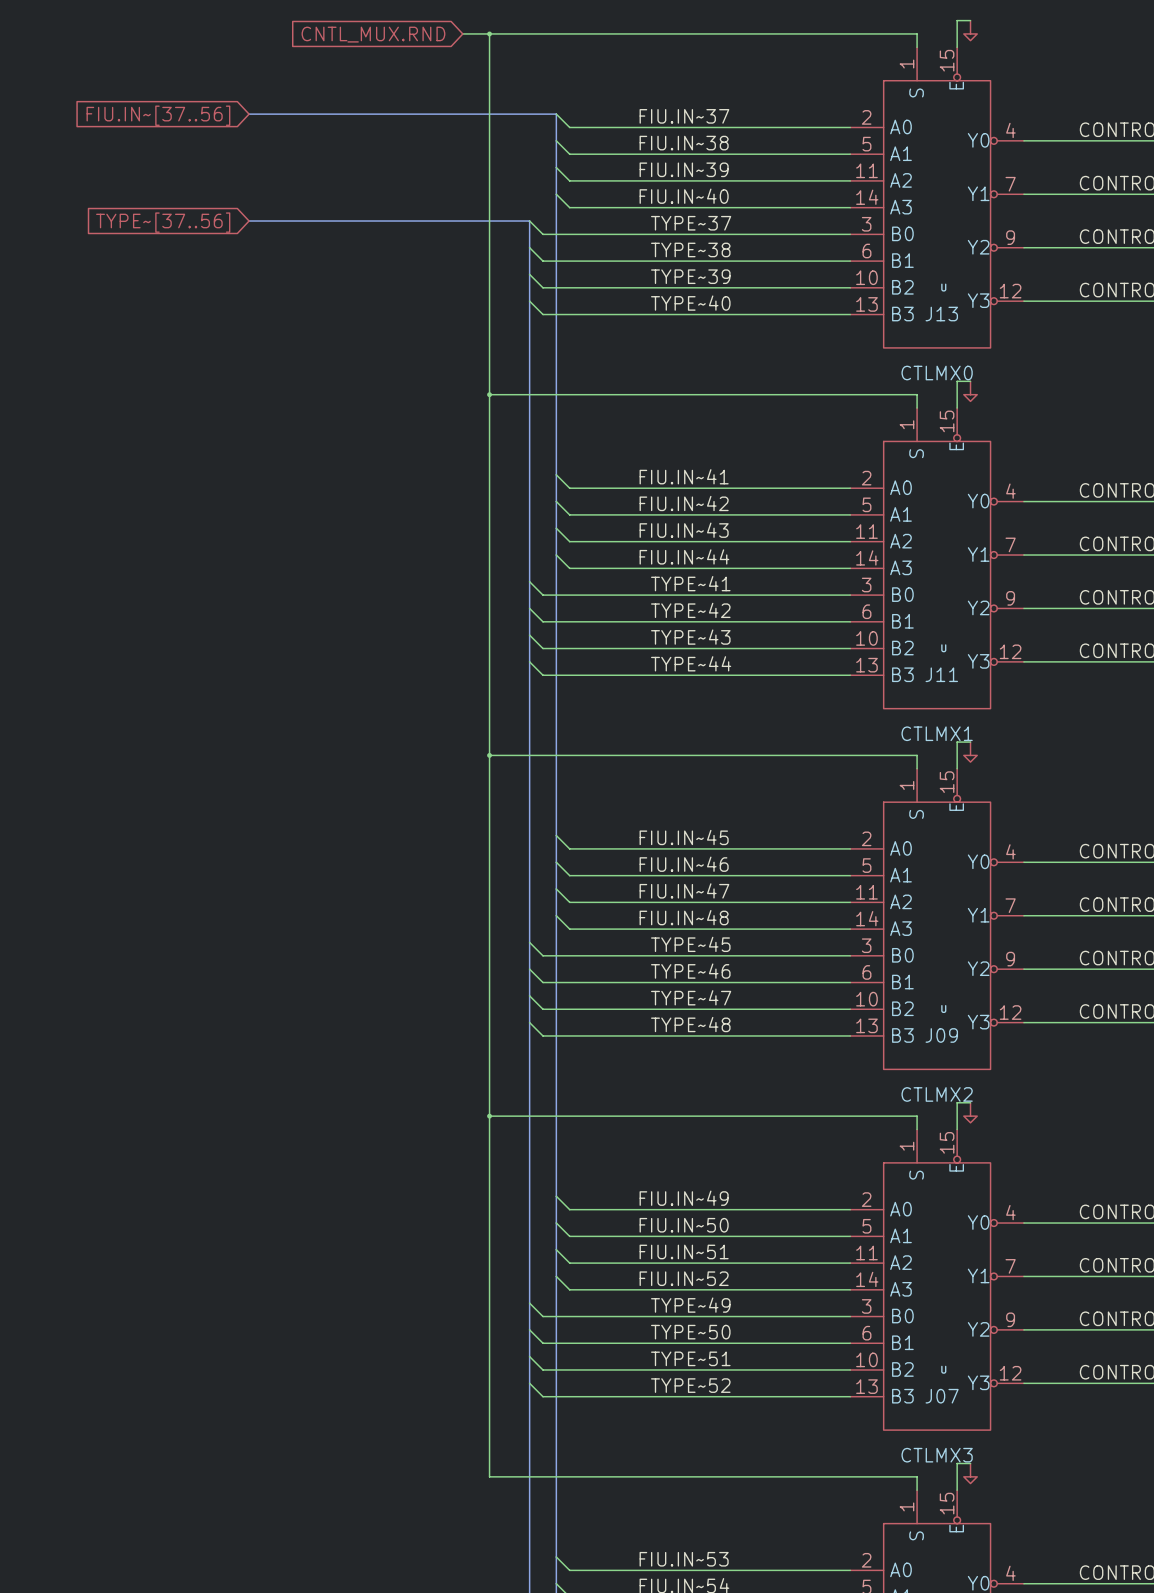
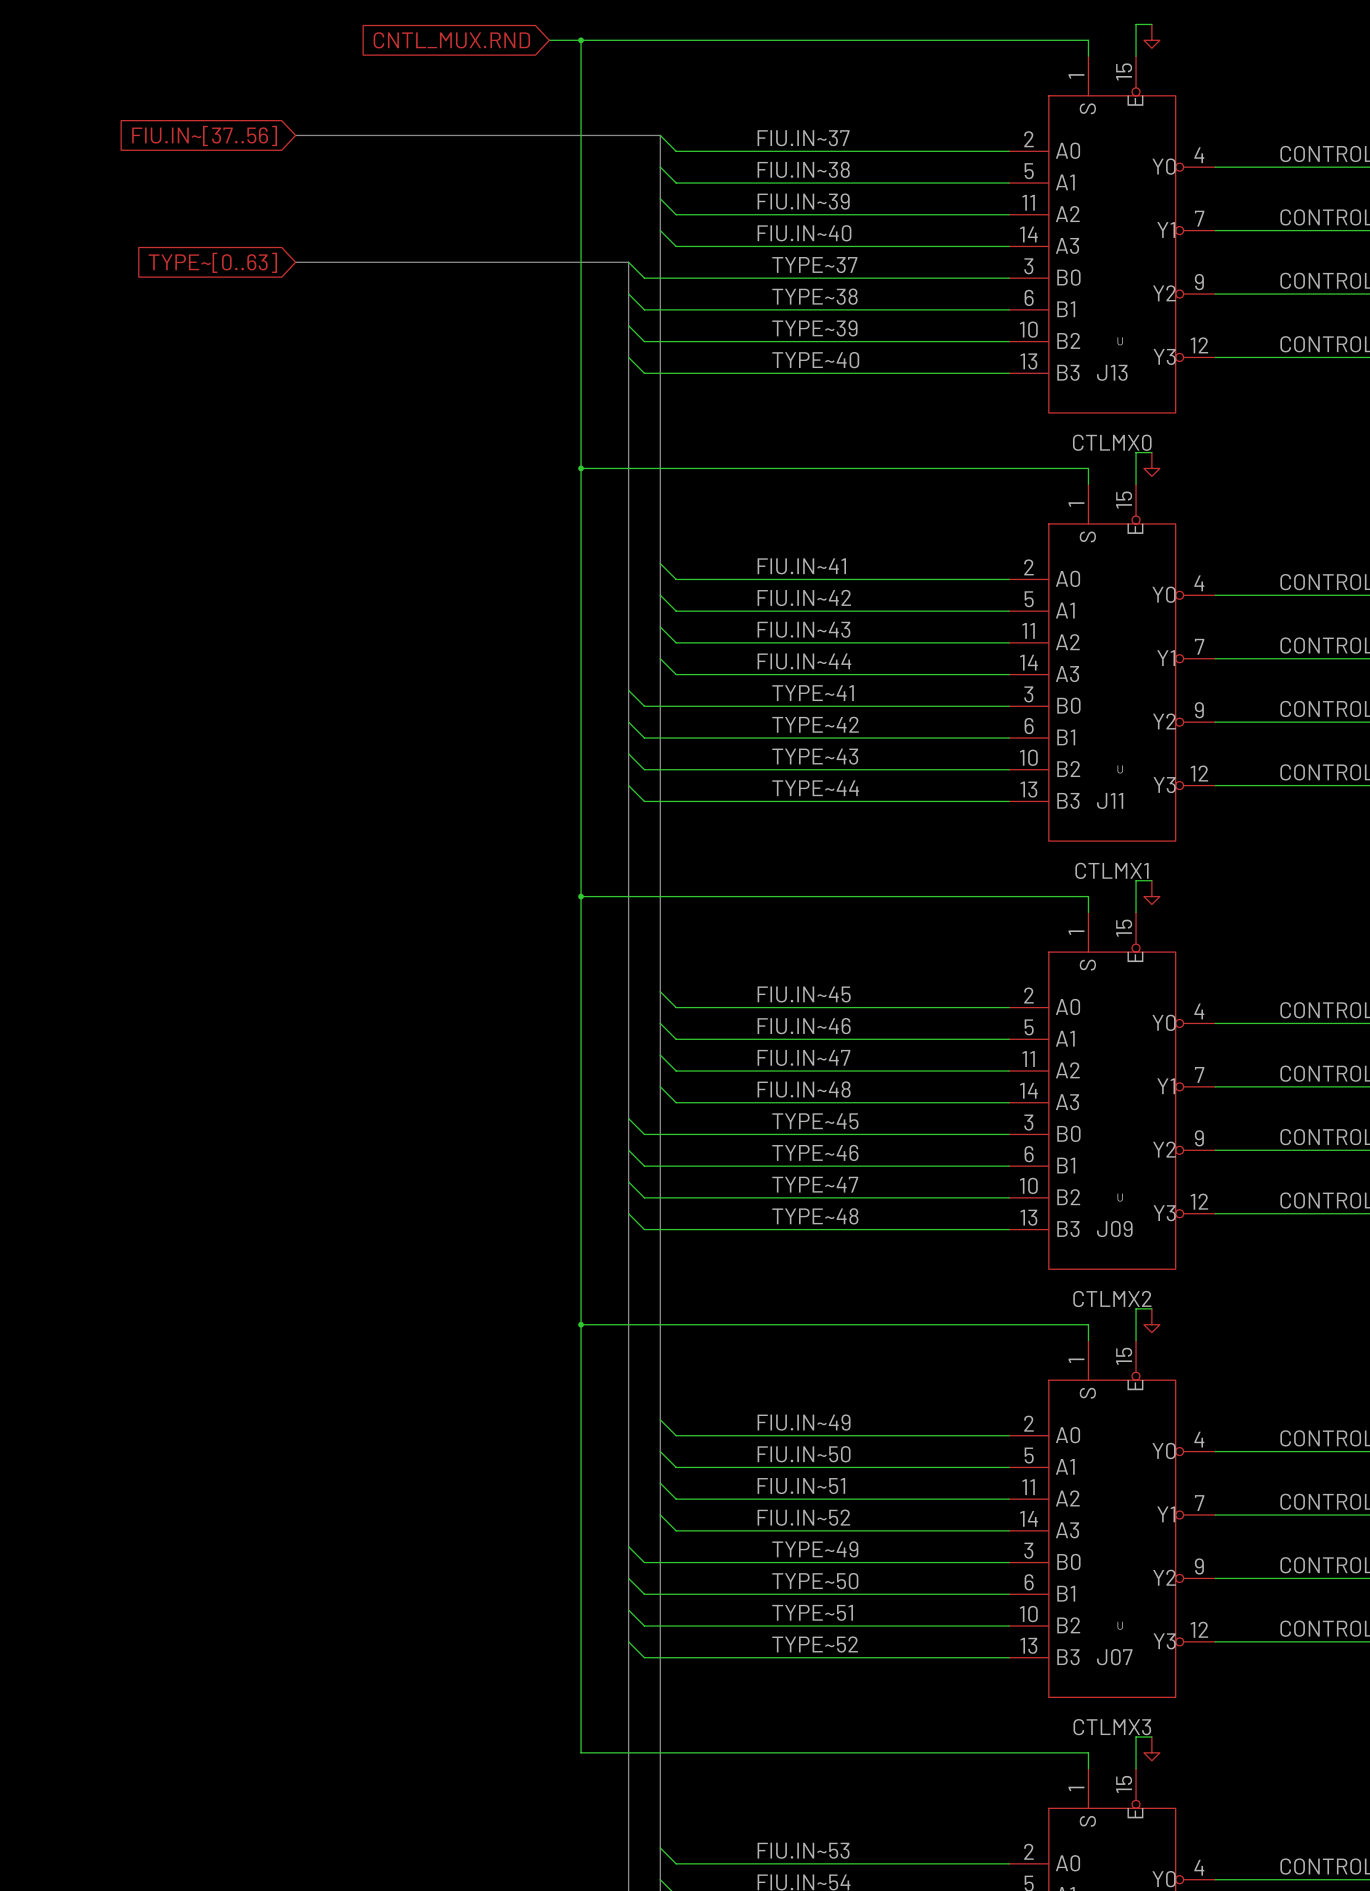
global label: TYPE~[37..56] (163, 222) -> TYPE~[0..63] (212, 262)

